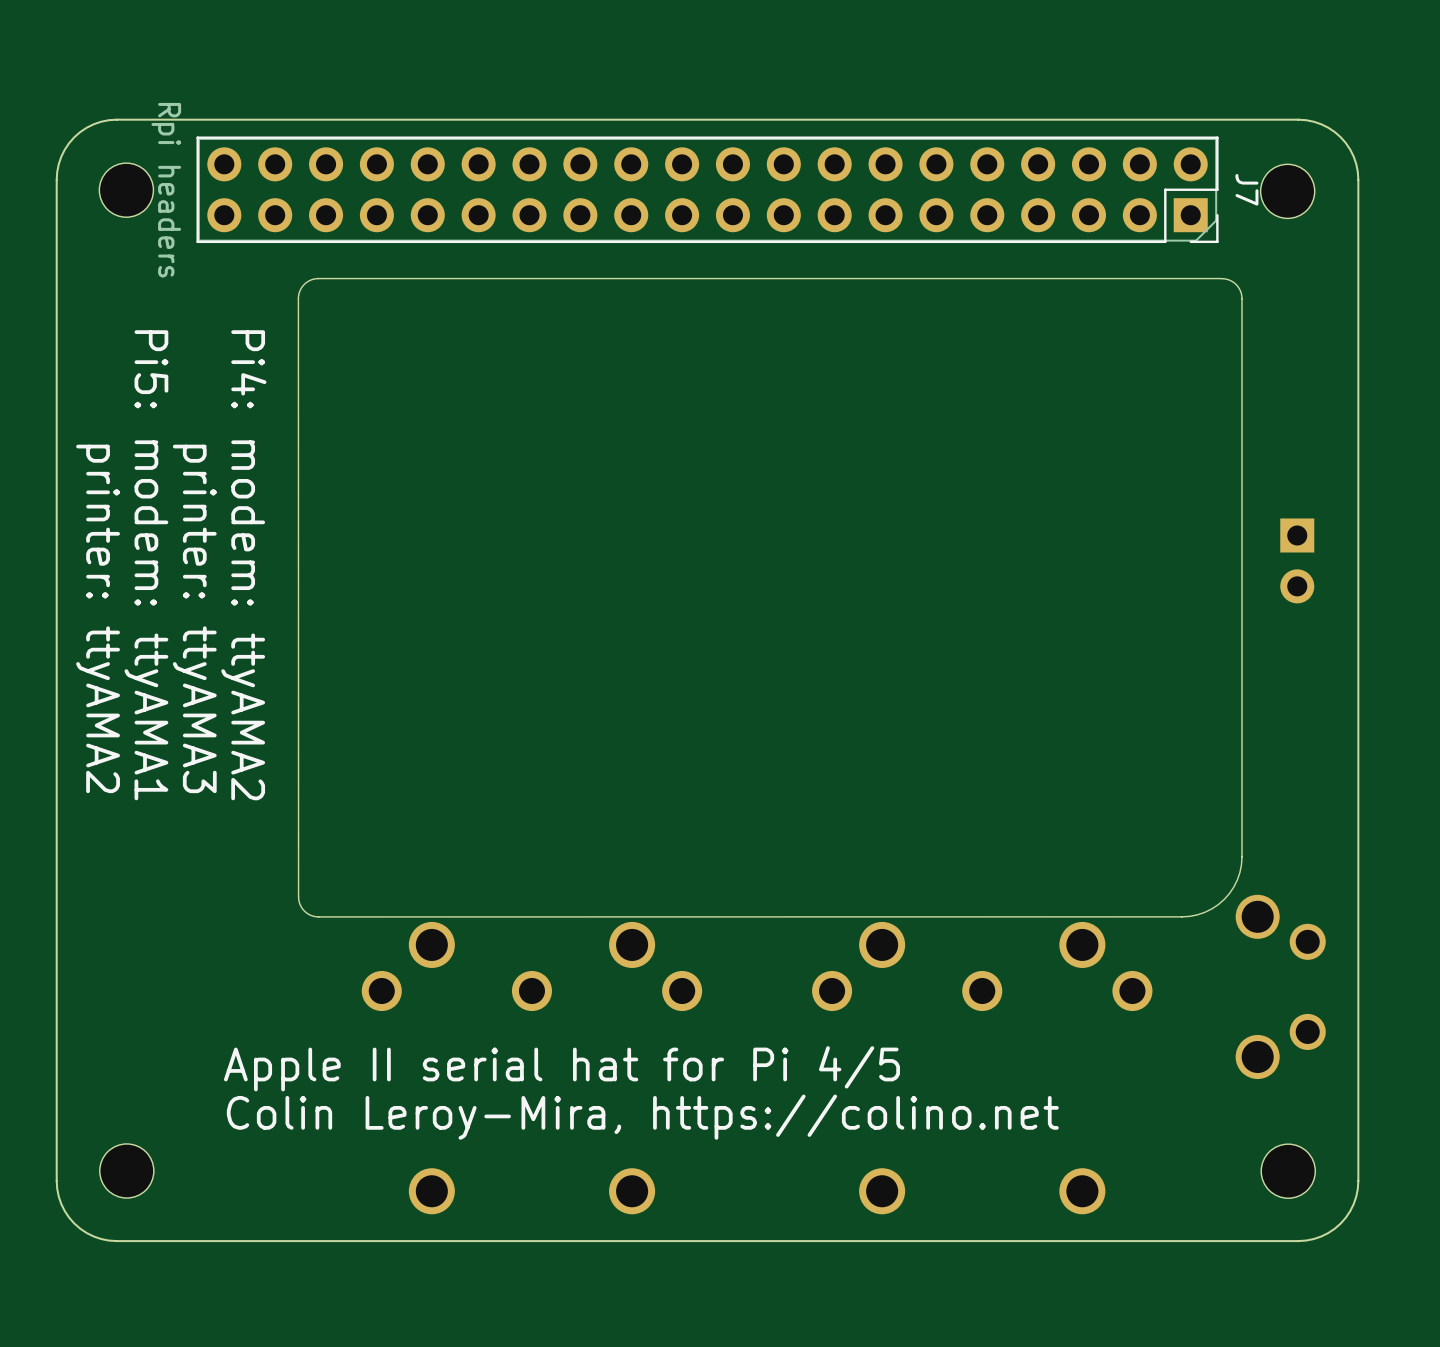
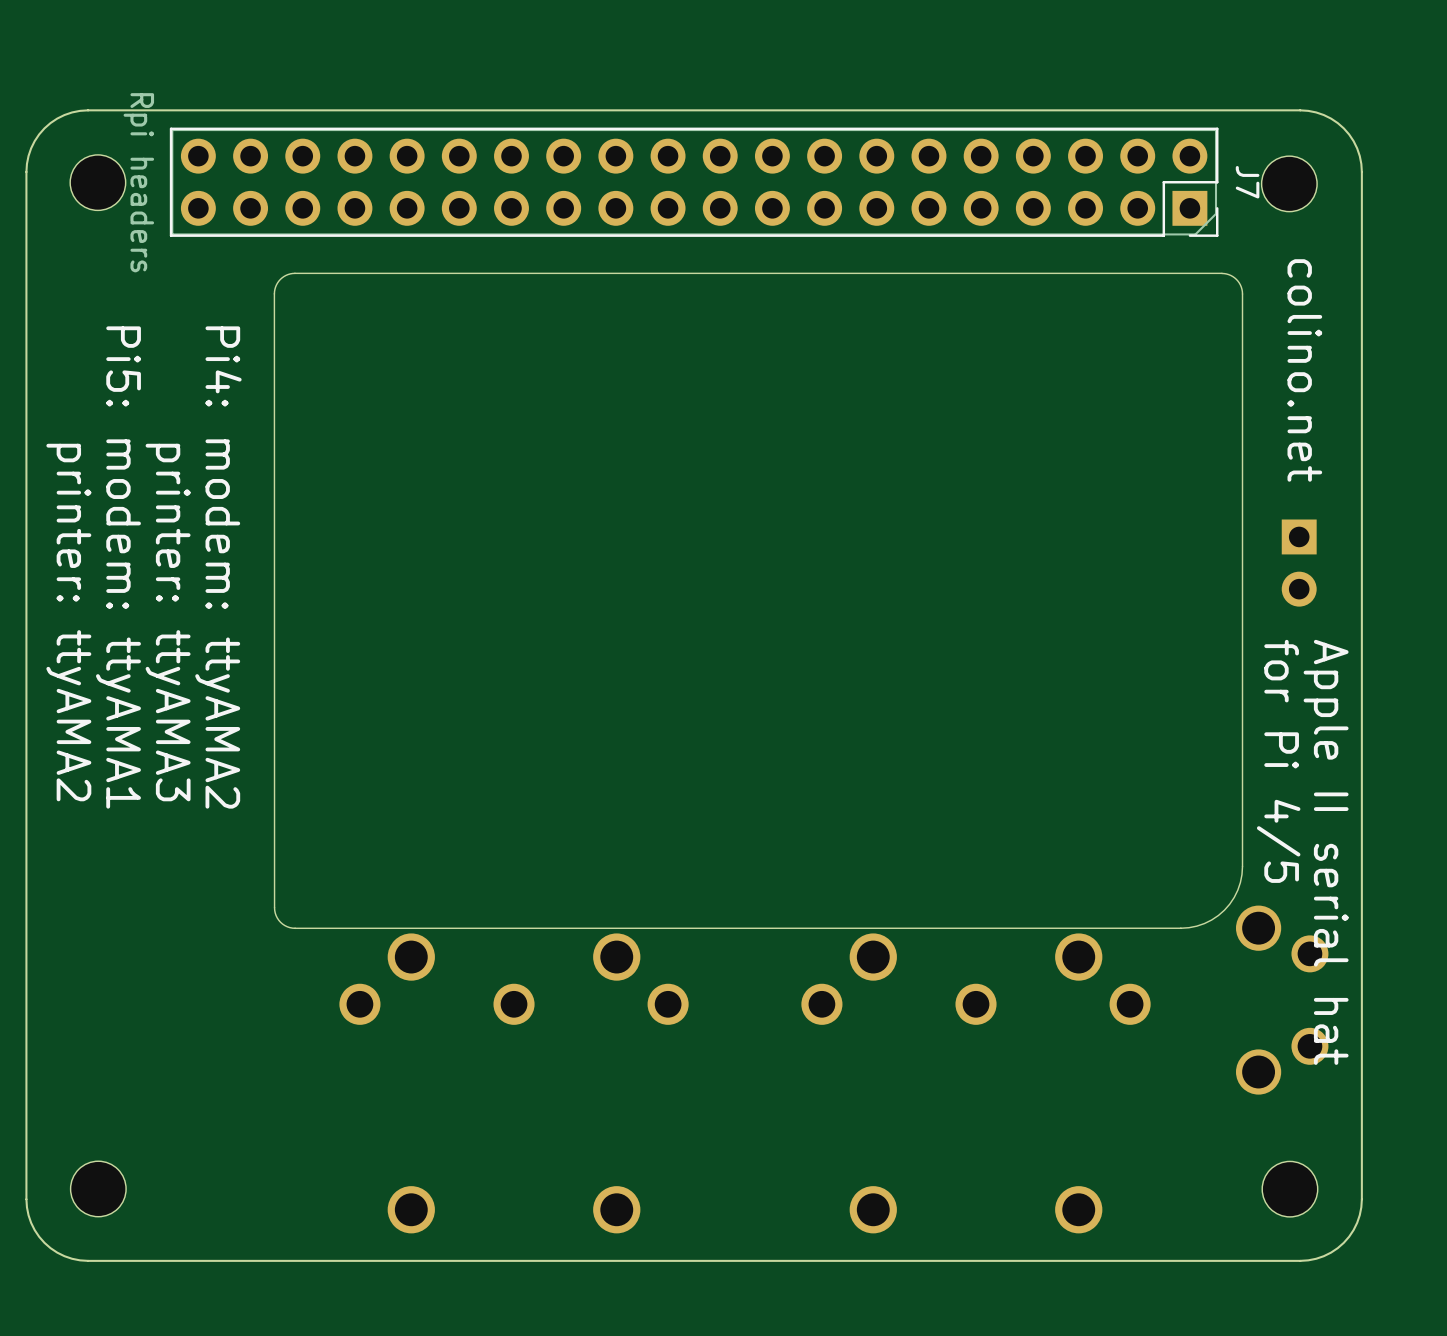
text: none -> colino.net (1304, 370)
text: none -> for Pi 4/5 (1278, 761)
text: none -> Apple II serial hat (1326, 852)
text: Apple II serial hat for Pi 4/5 (561, 1068) -> none
text: Colin Leroy-Mira, https://colino.net (642, 1117) -> none

